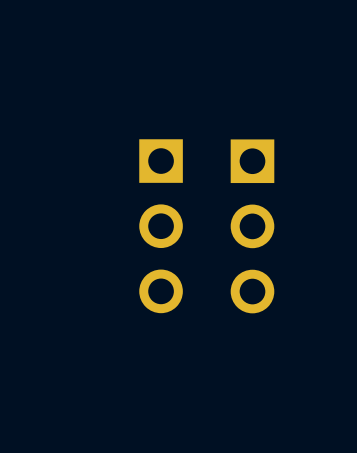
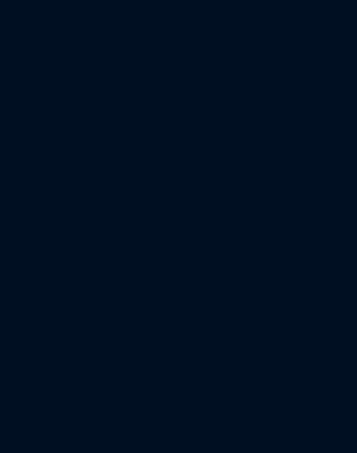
part: (161, 226) -> none
part: (252, 226) -> none

